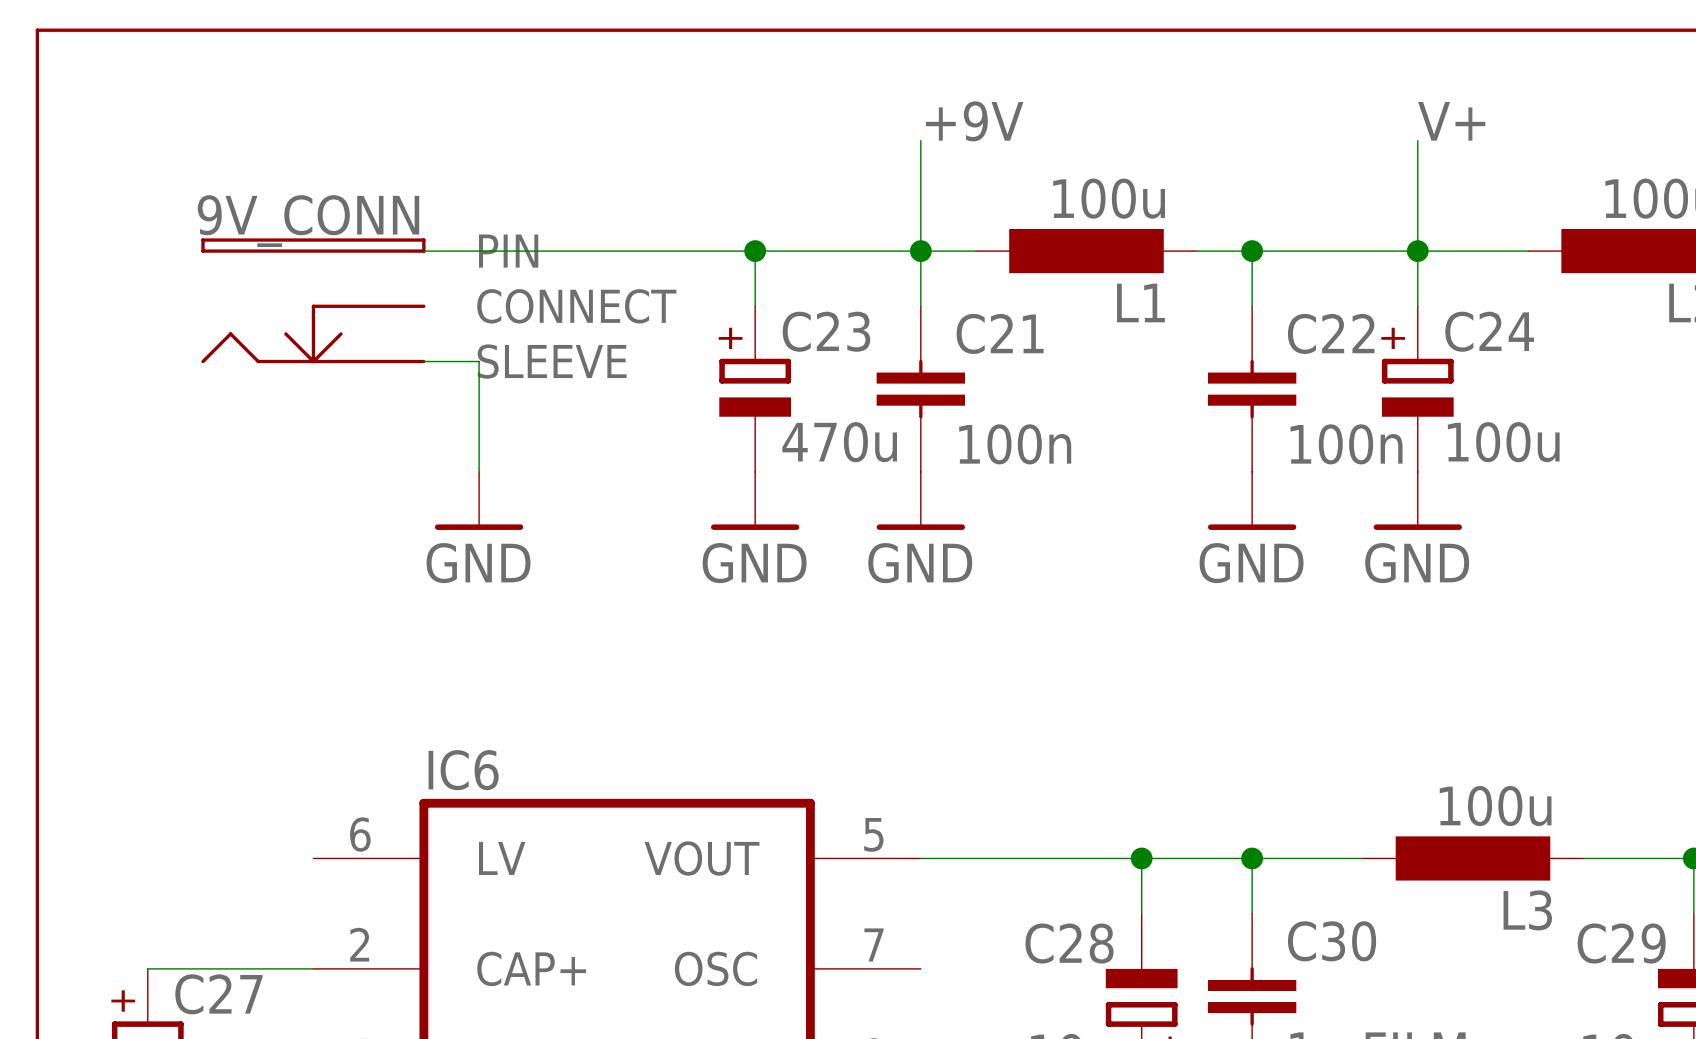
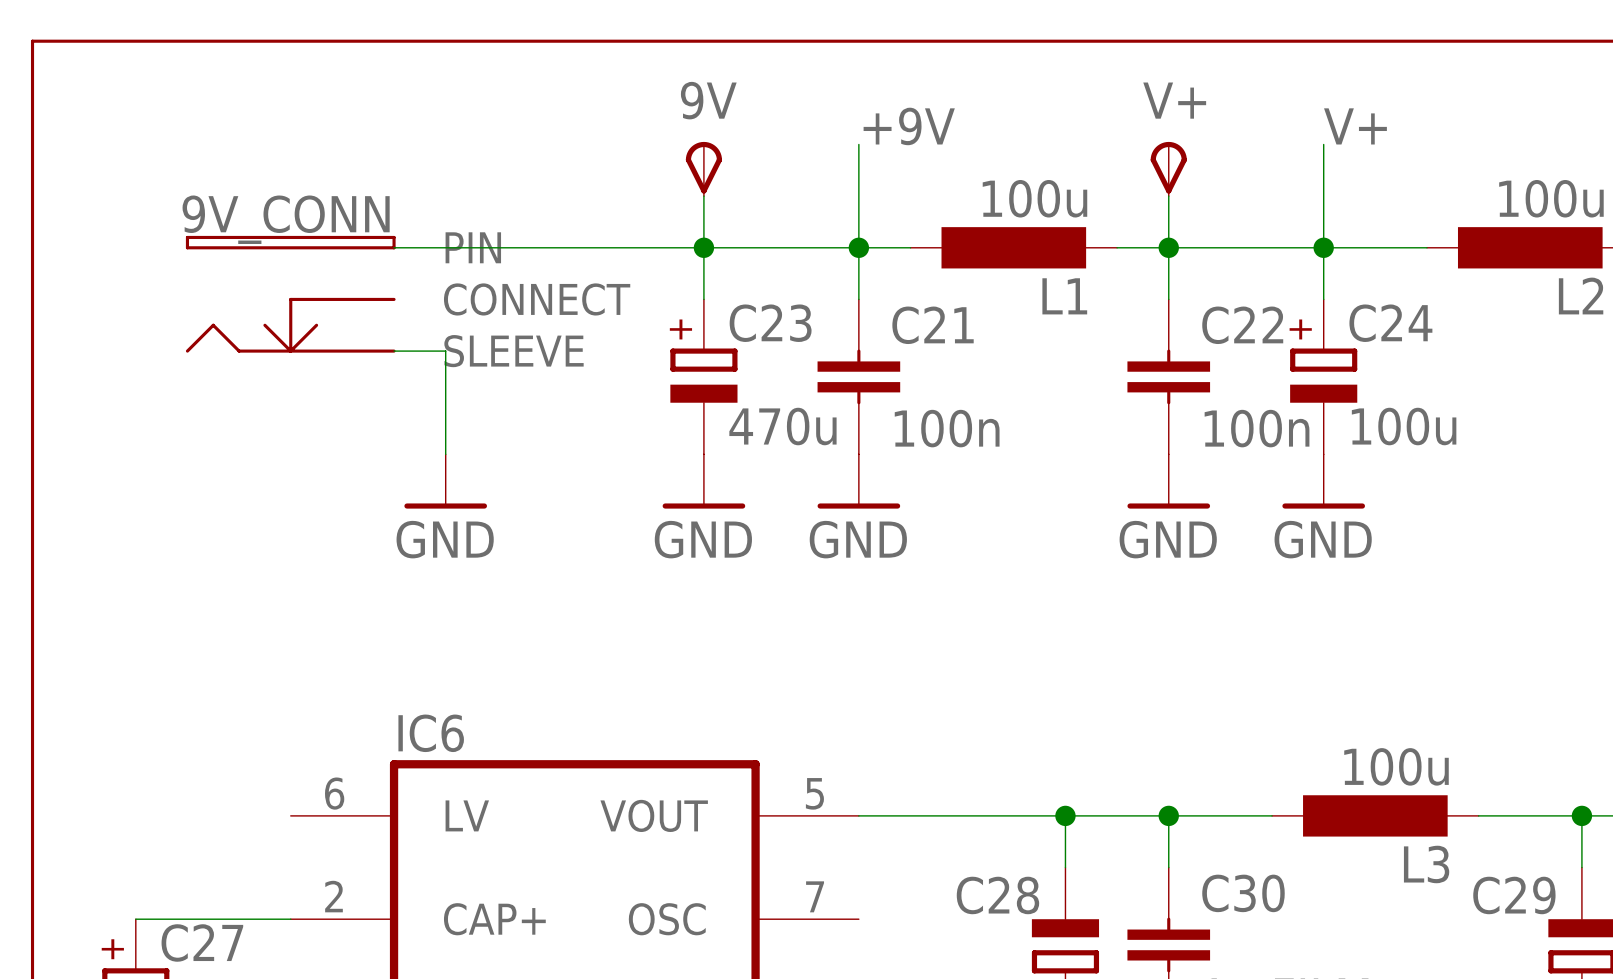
9V: none -> (703, 169)
V+: none -> (1168, 169)
wire: none -> (703, 196) (703, 247)
wire: none -> (1168, 196) (1168, 247)

